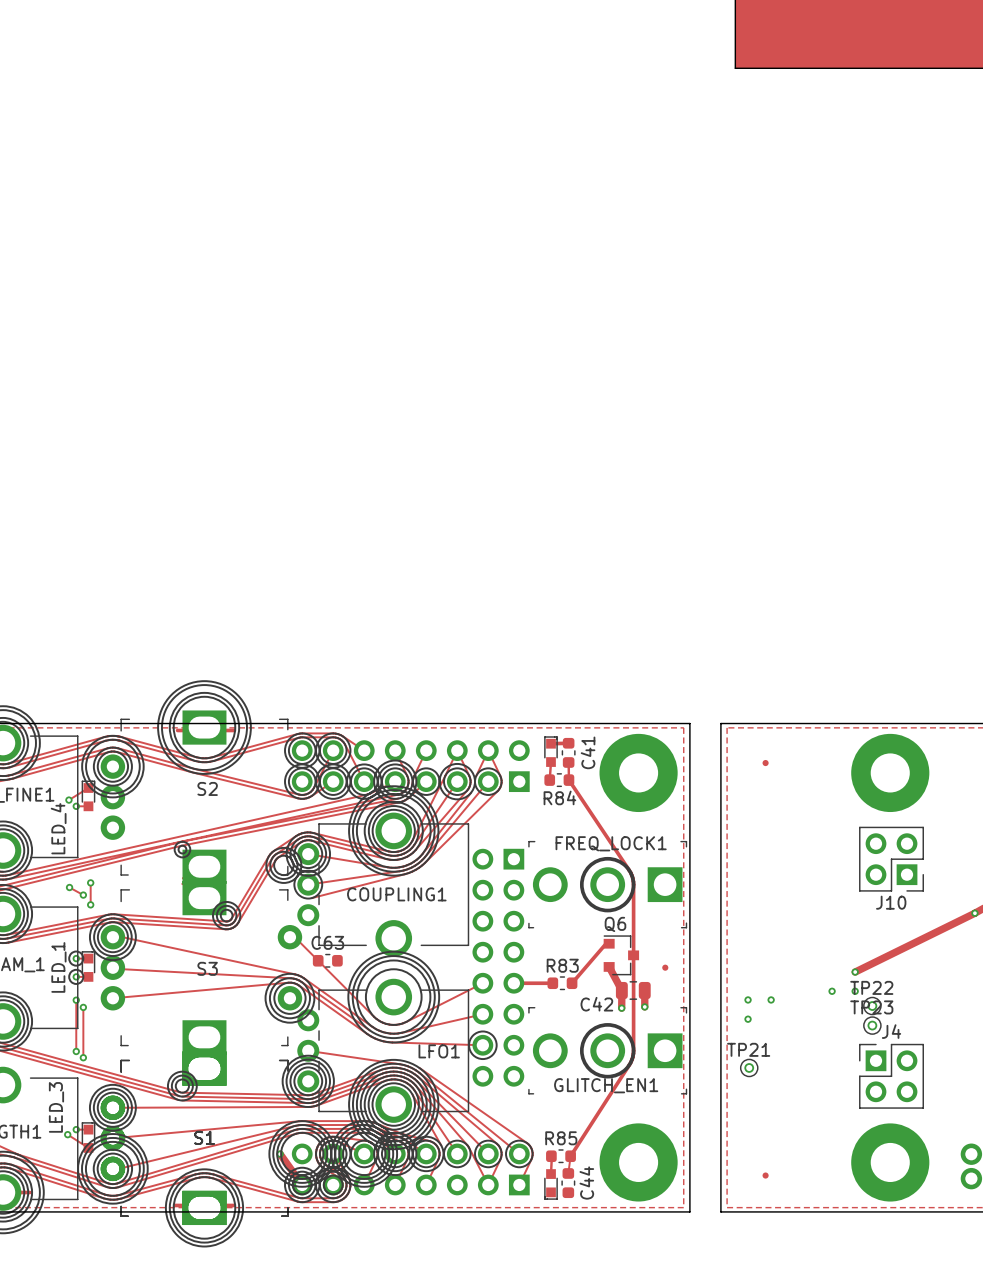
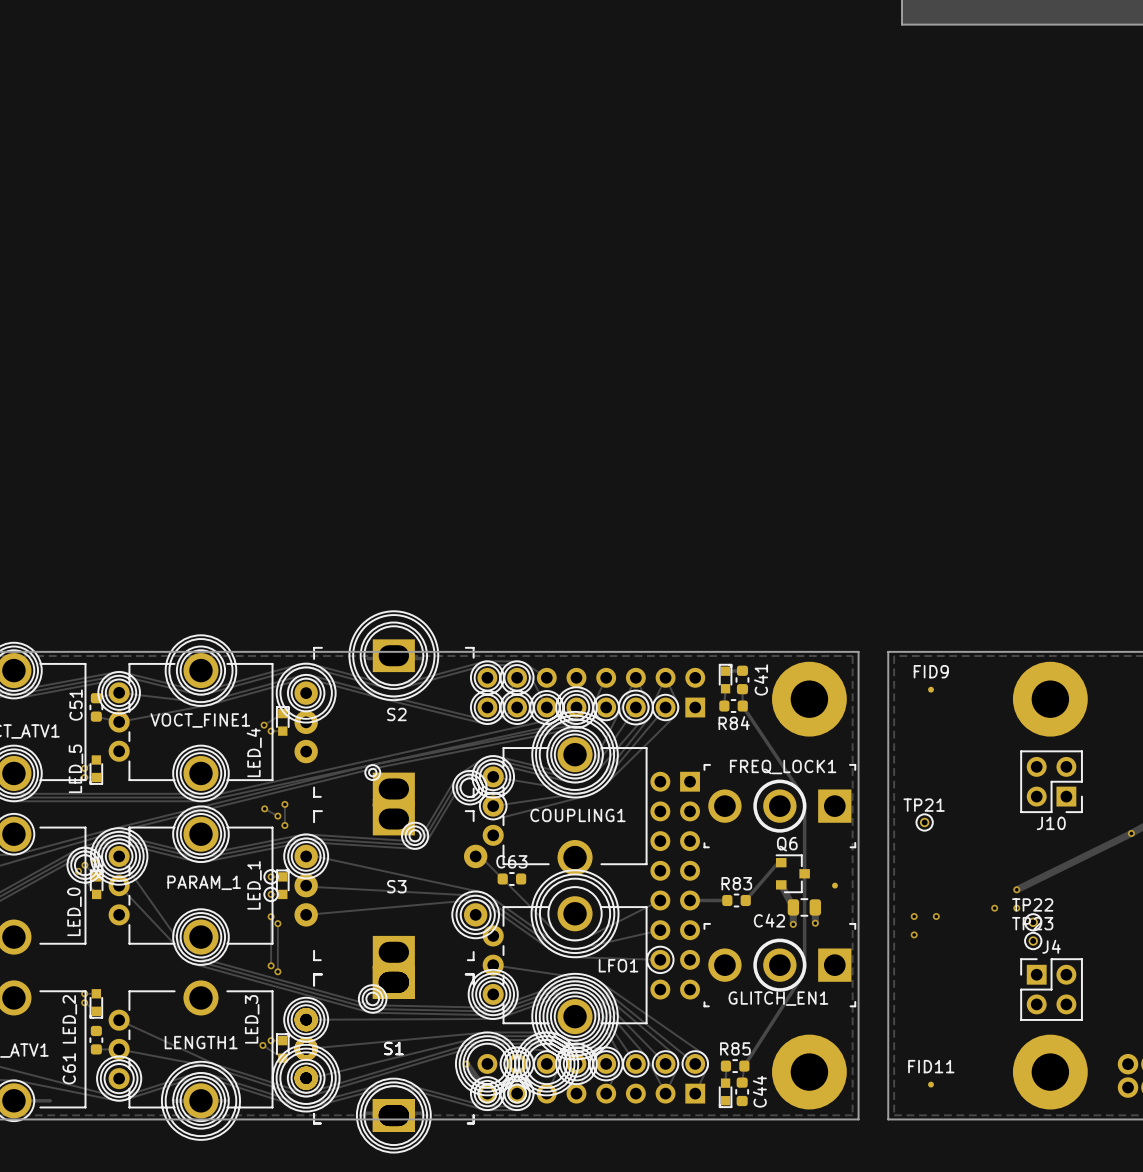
FID9 name: none -> FID9 (931, 671)
TP21 position: (749, 1067) -> (924, 822)
FID11 name: none -> FID11 (931, 1066)

